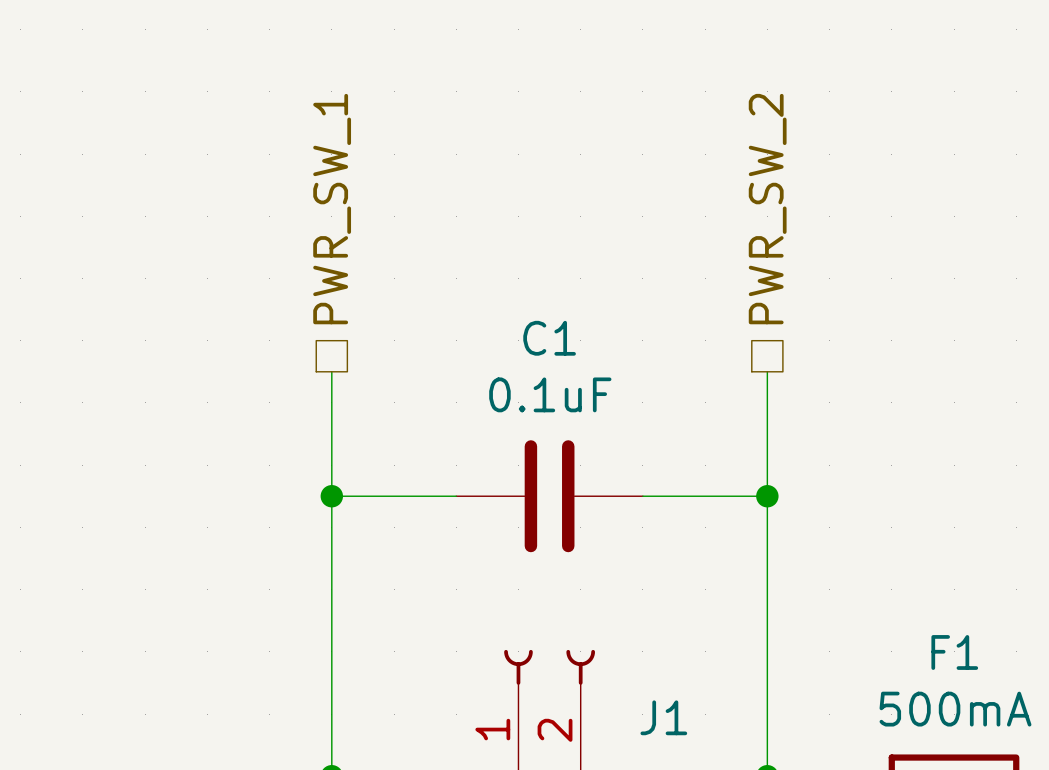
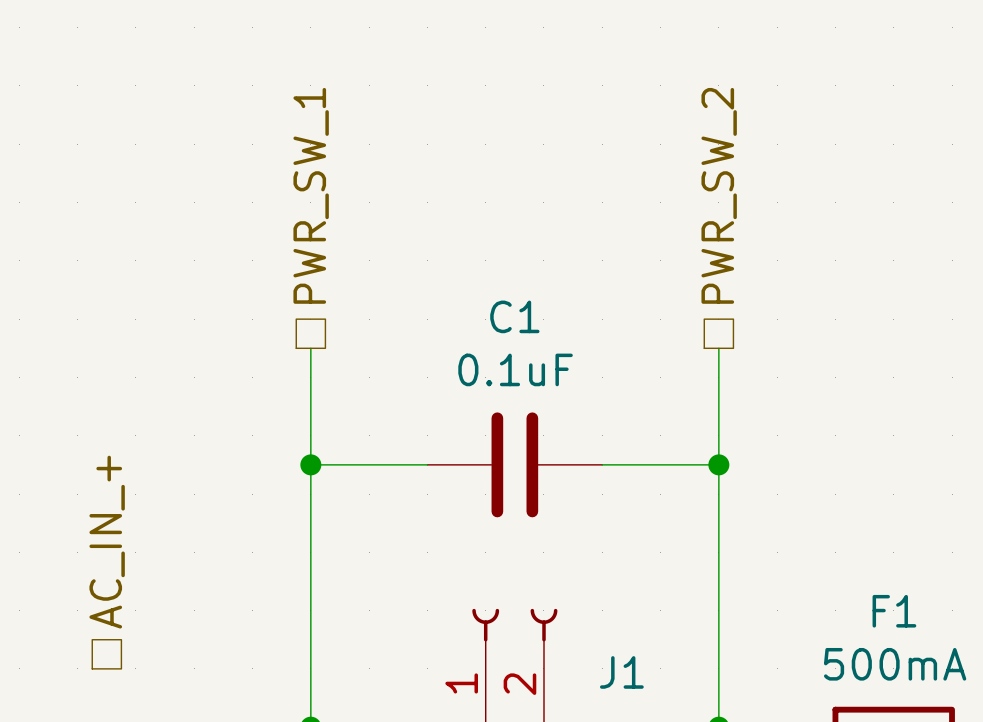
hierarchical label: none -> AC_IN_+ (107, 542)

